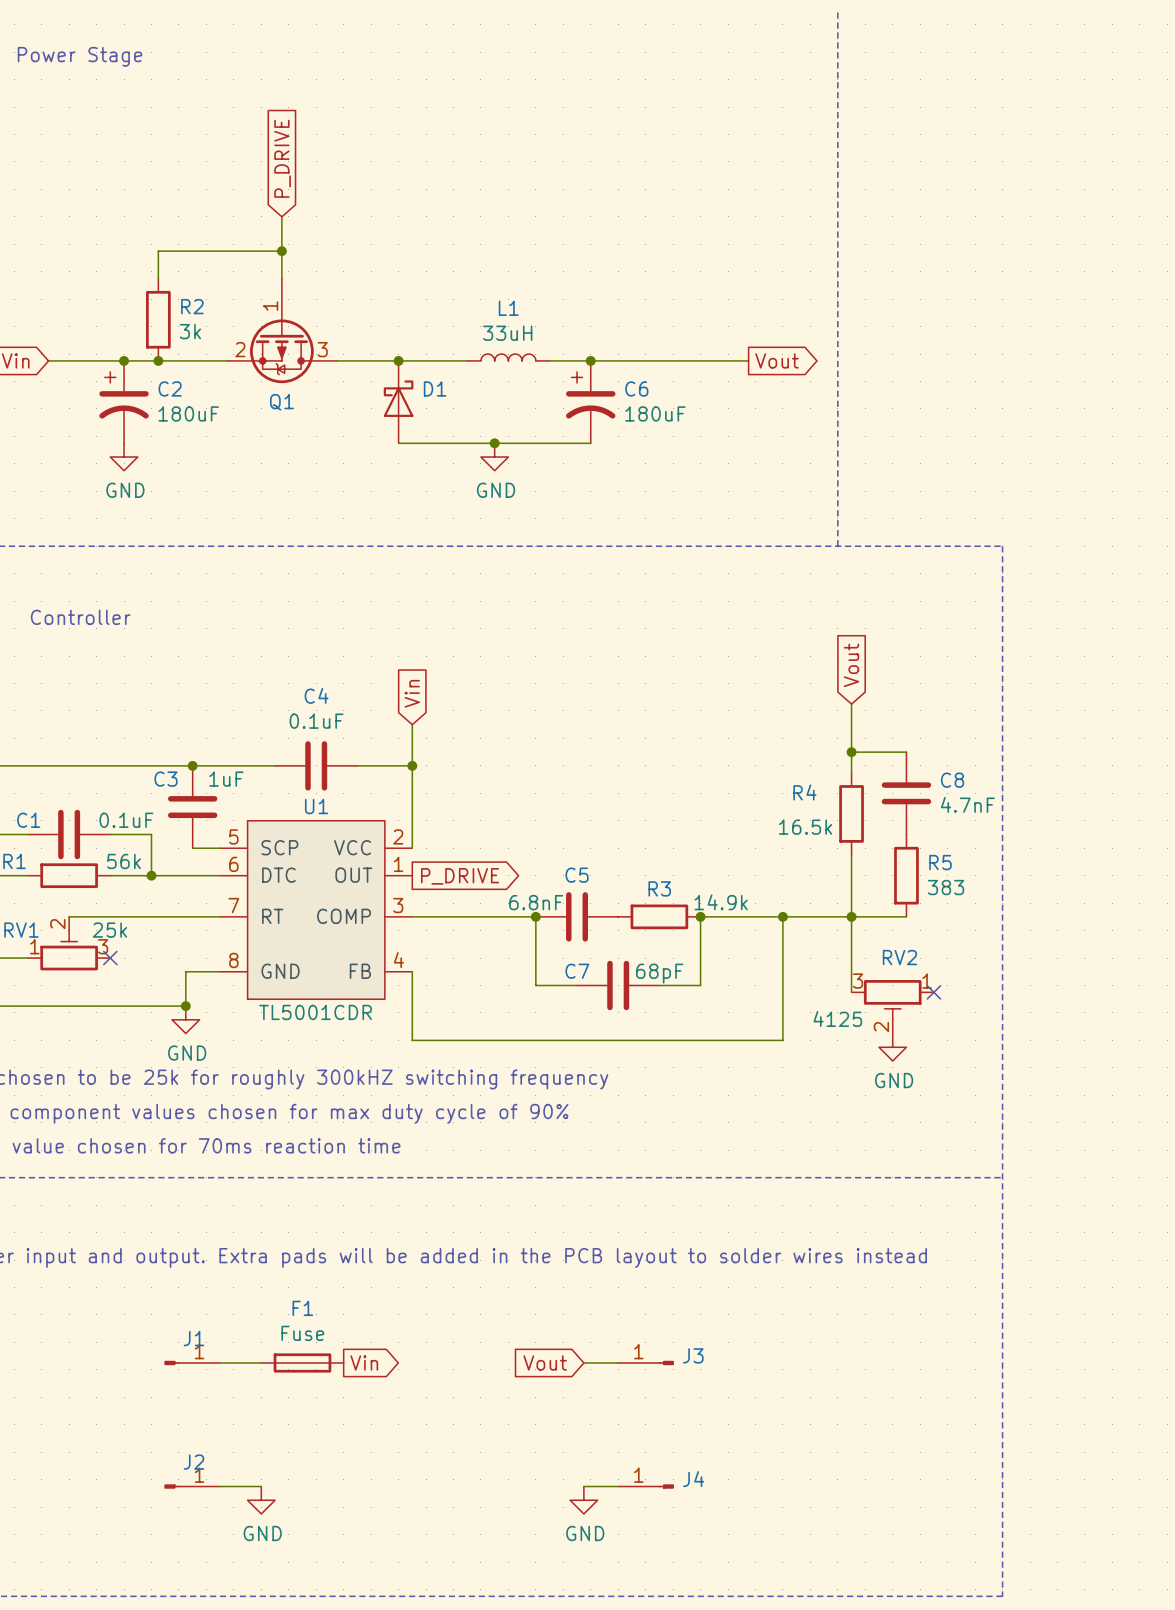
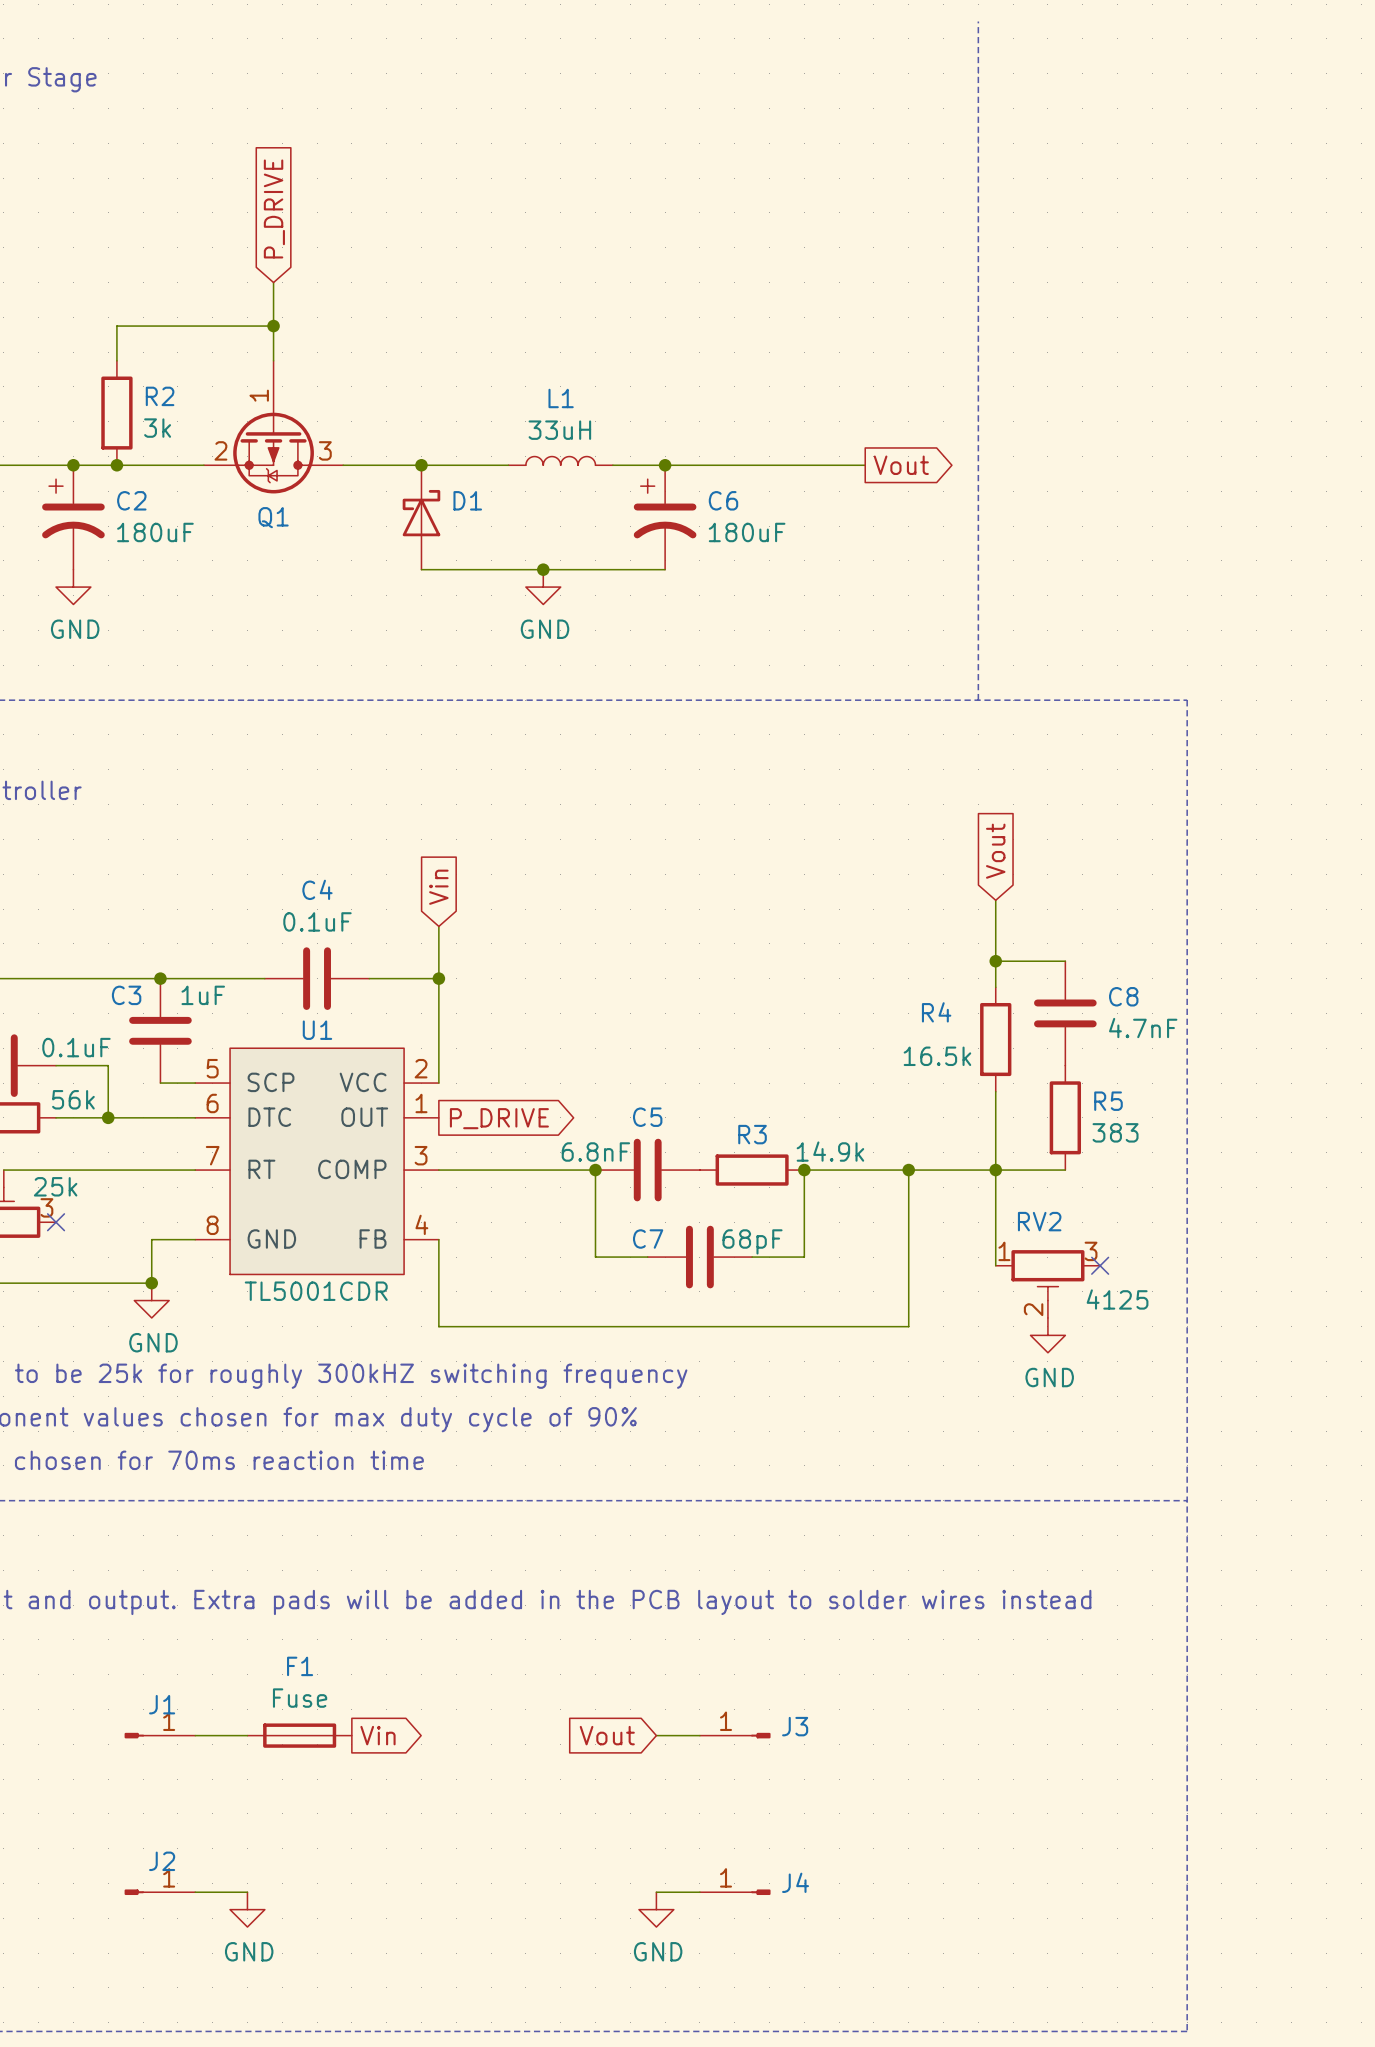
RV2 flip: as is (892, 999) -> left-right (1047, 1275)

